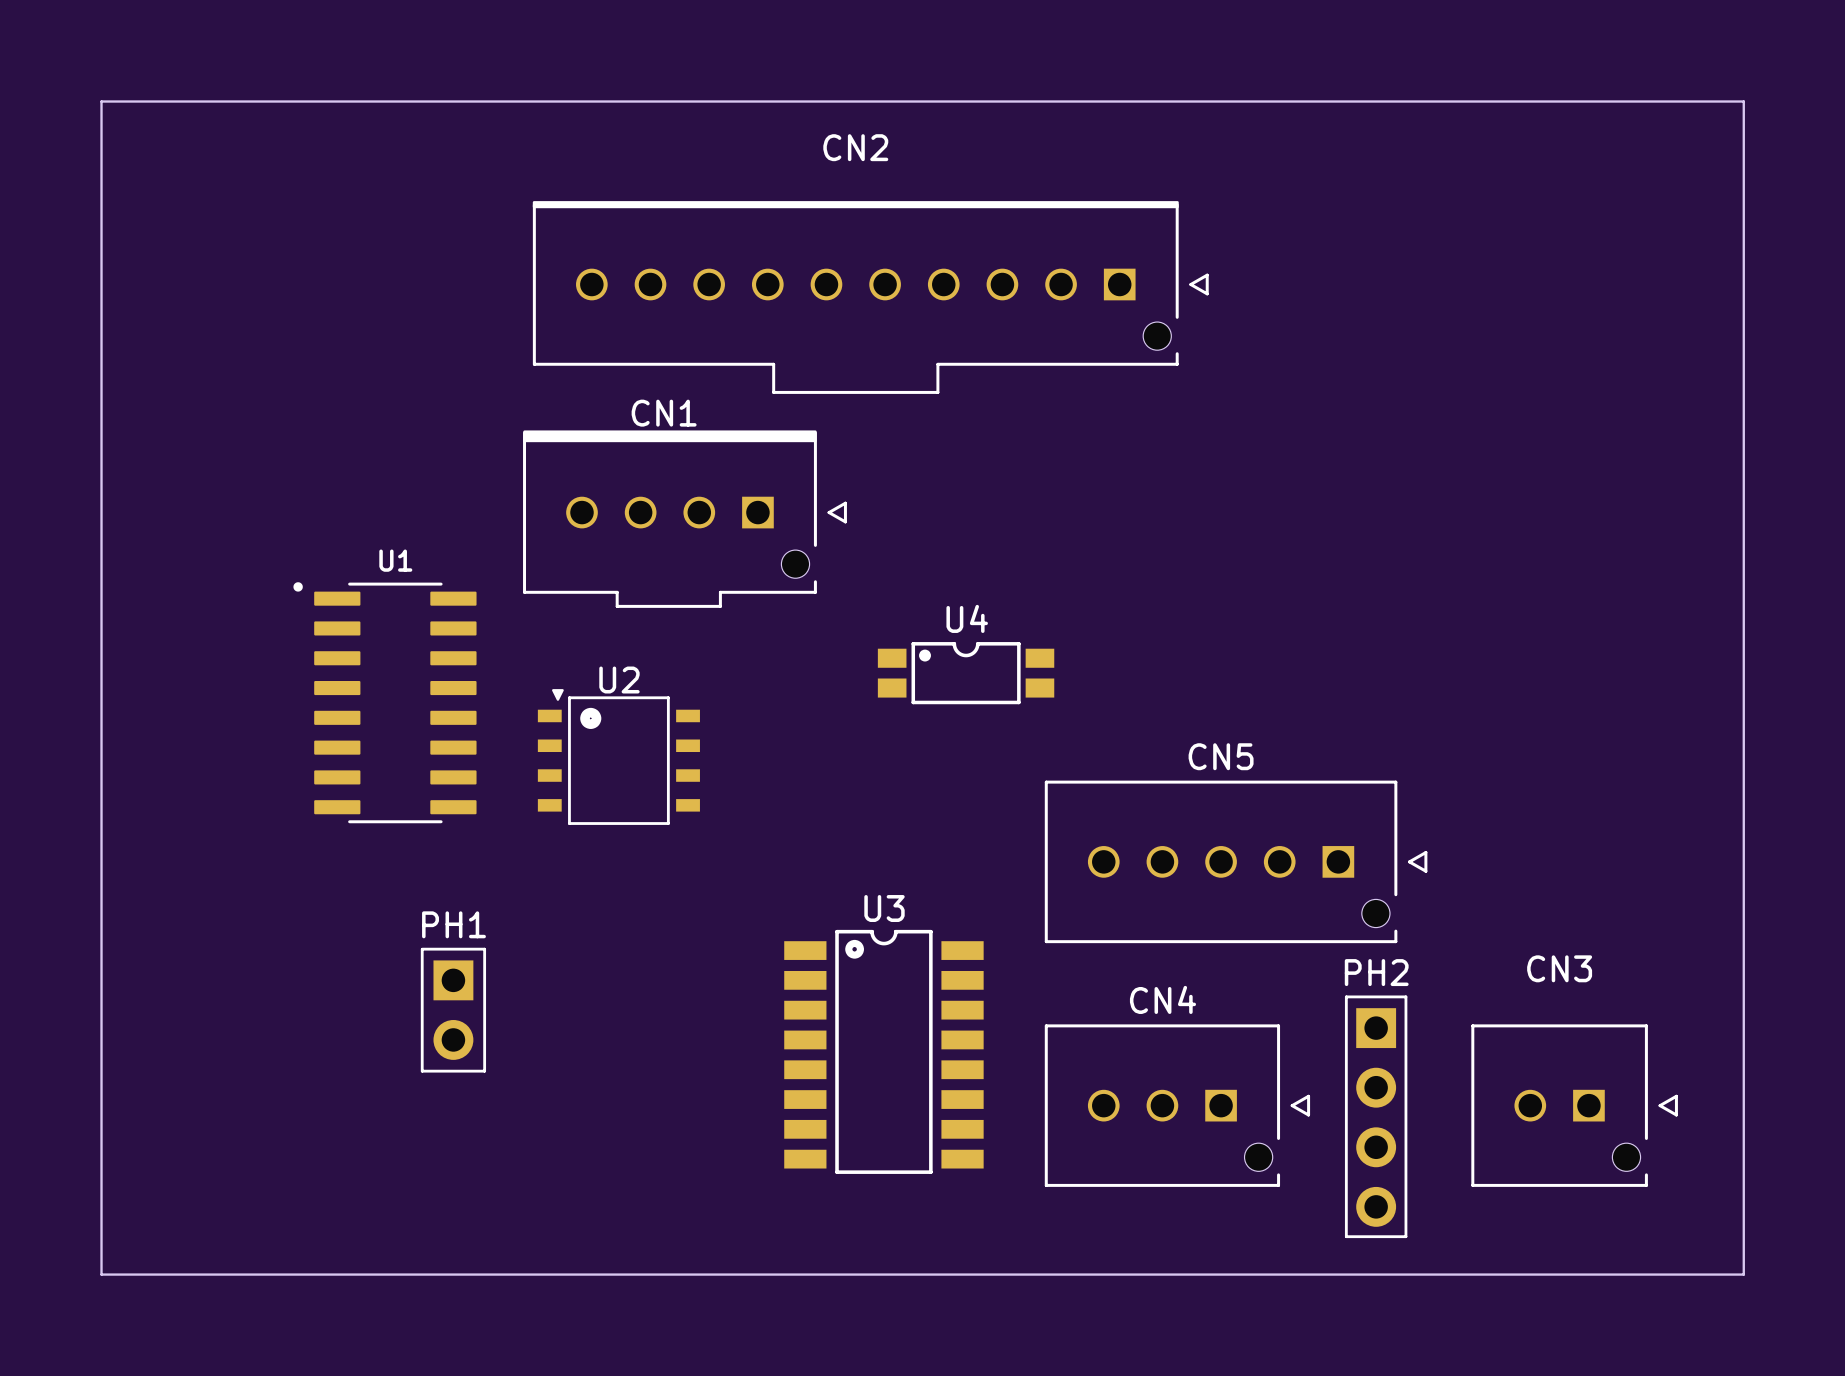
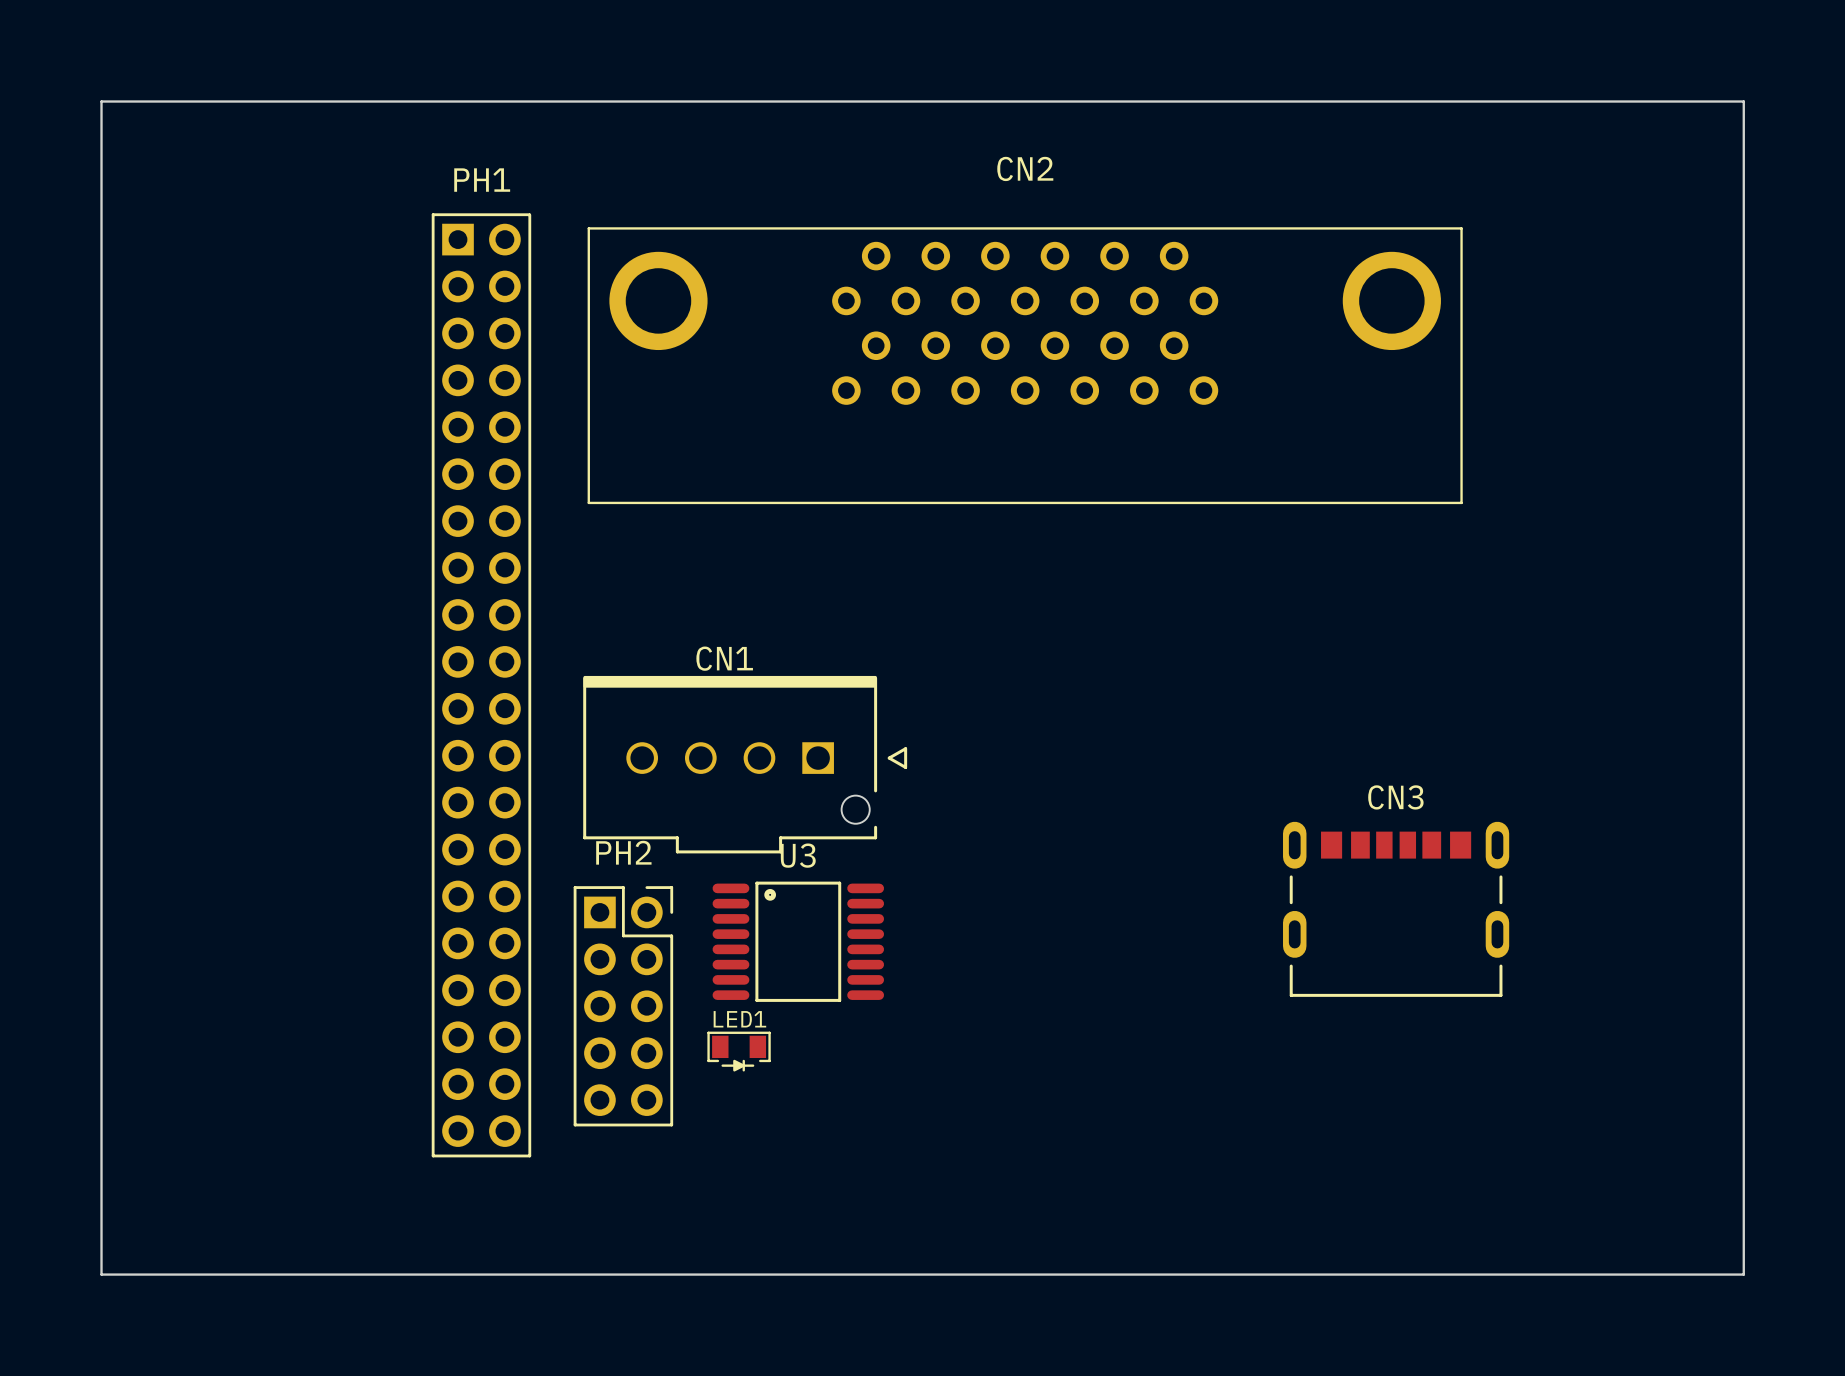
CN2 name position: CN2 (855, 147) -> CN2 (1025, 168)
CN2 footprint: [532, 201, 1209, 394] -> [587, 227, 1463, 505]
CN1 position: (684, 519) -> (745, 764)
U4: (966, 673) -> none
U1: (384, 702) -> none
U2: (618, 757) -> none
CN5: (1236, 861) -> none
U3 name position: U3 (884, 908) -> U3 (798, 855)
PH1 name position: PH1 (453, 924) -> PH1 (482, 180)
U3 footprint: [784, 929, 984, 1174] -> [712, 881, 885, 1002]
PH1 footprint: [420, 947, 487, 1073] -> [431, 213, 532, 1158]
PH2 footprint: [1344, 995, 1408, 1239] -> [573, 886, 674, 1127]
CN3 footprint: [1471, 1024, 1678, 1187] -> [1283, 821, 1510, 997]
LED1: none -> (739, 1051)
CN4: (1177, 1105) -> none

